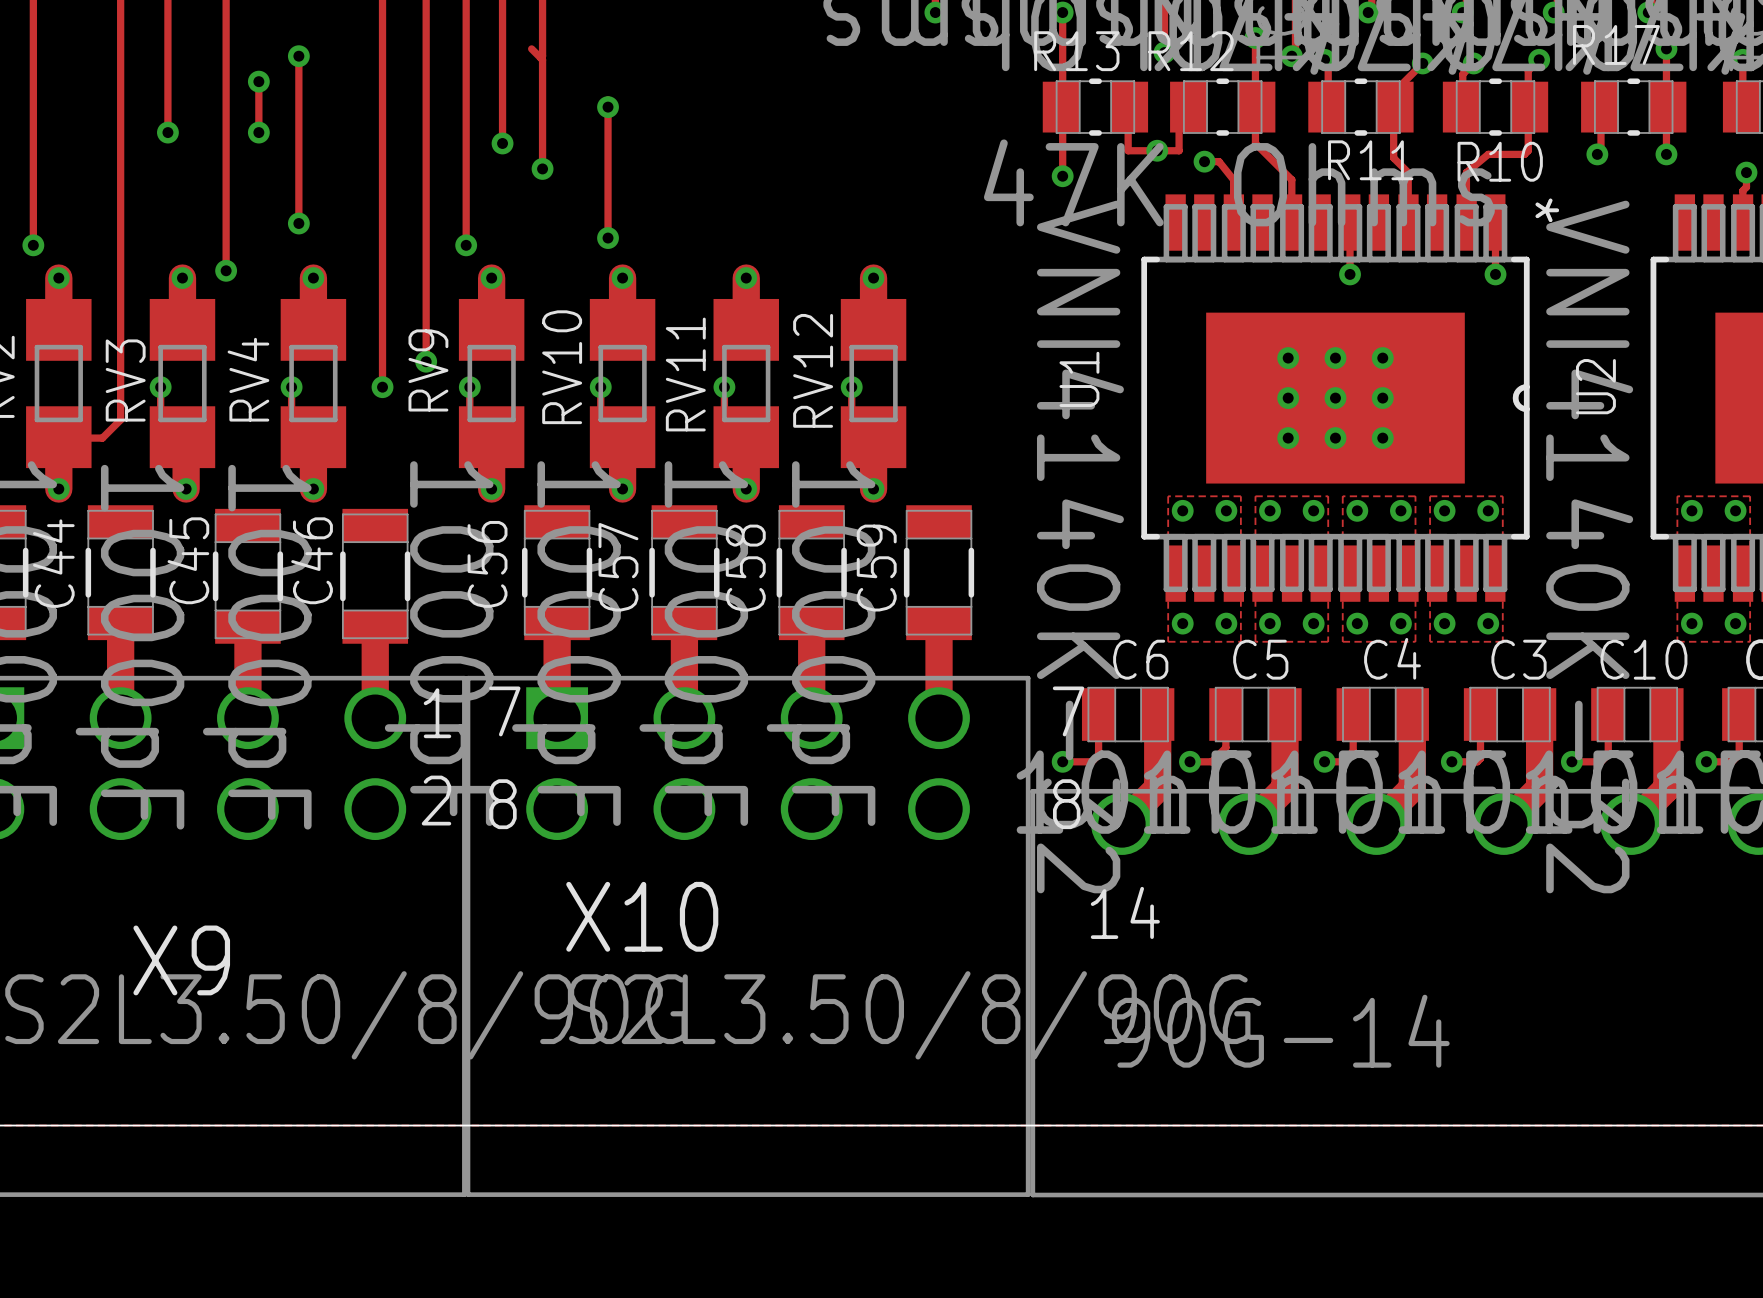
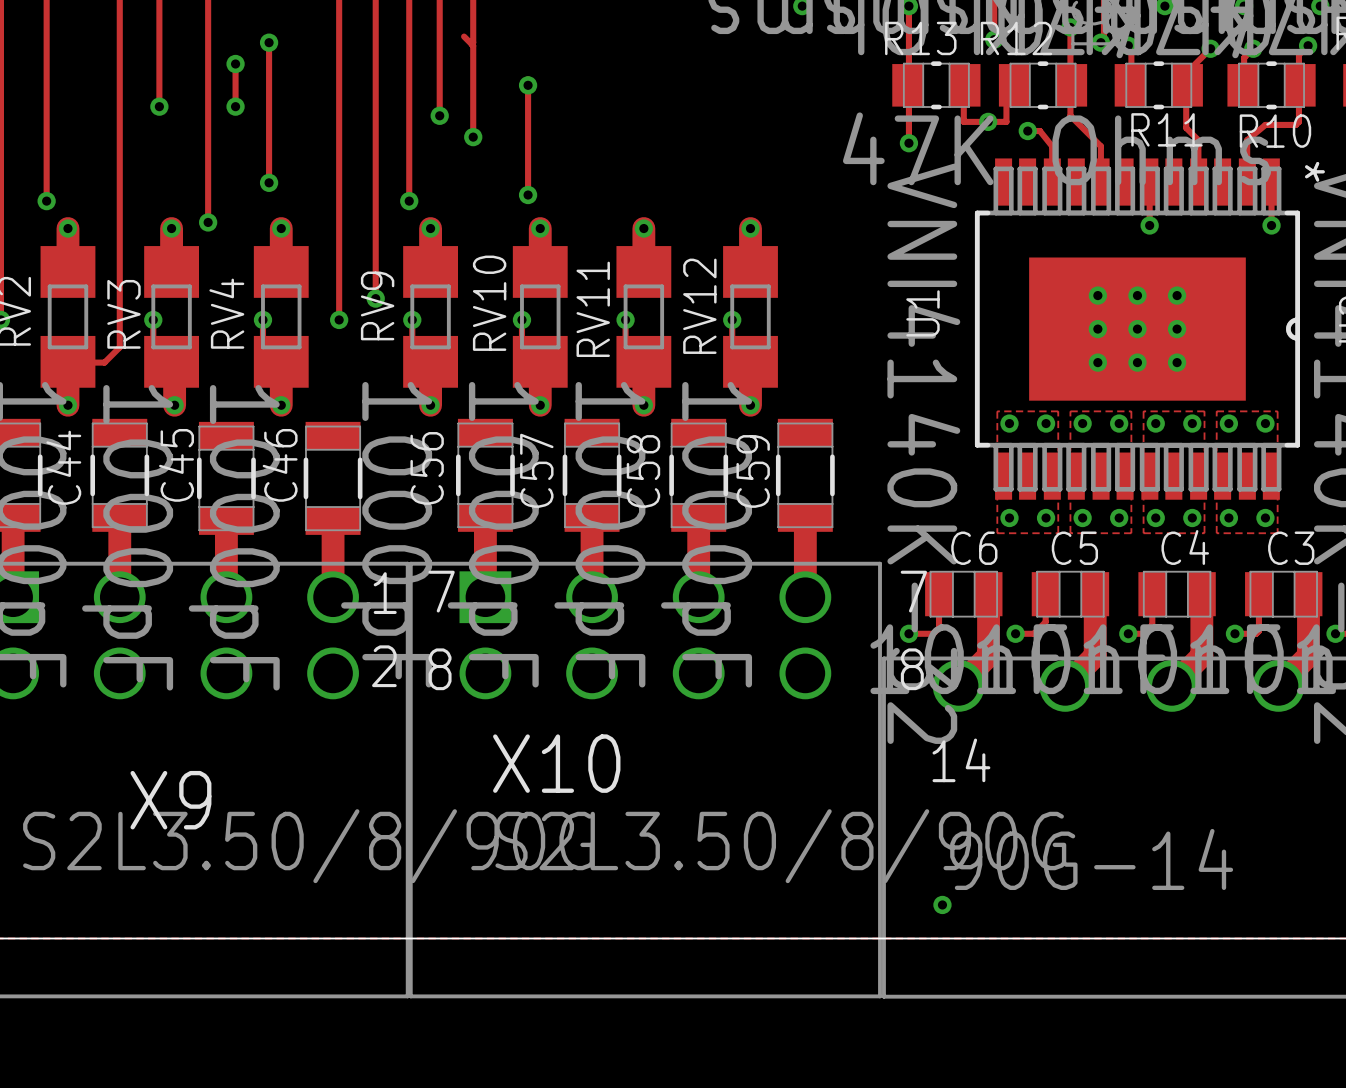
via: none -> (942, 904)

